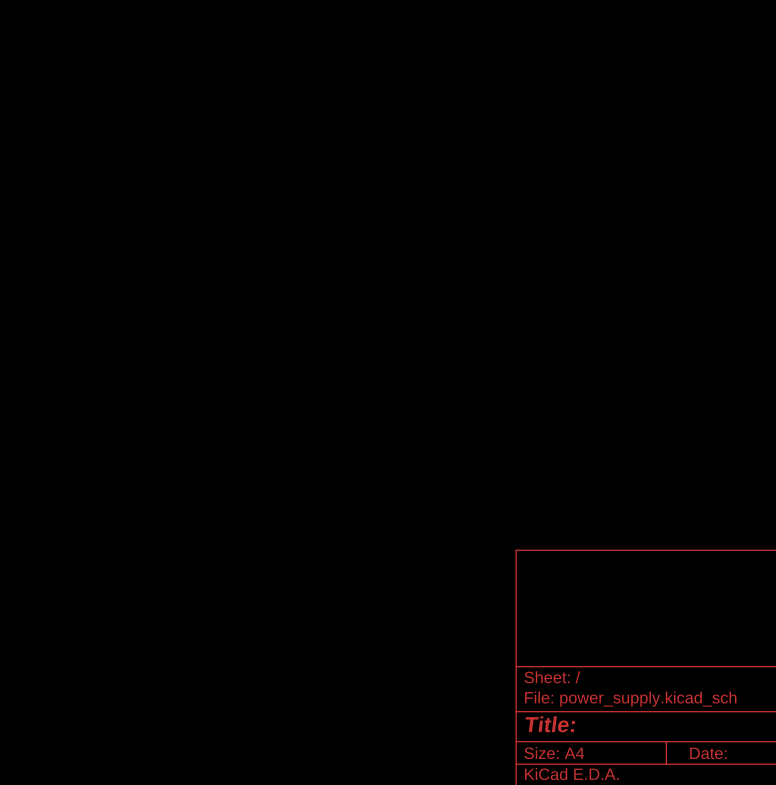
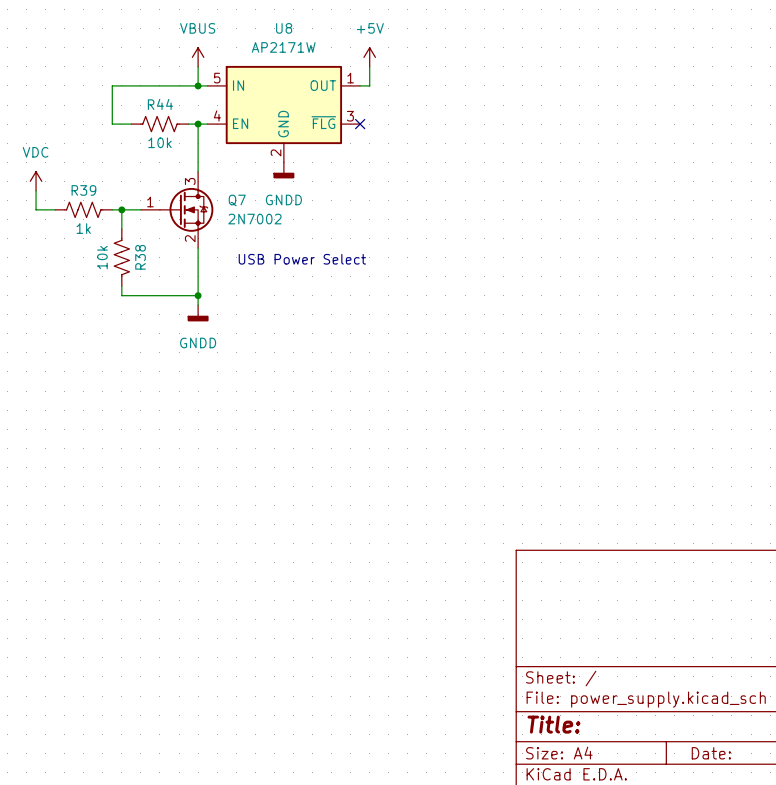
power symbol: none -> VBUS (198, 57)
power symbol: none -> +5V (369, 57)
wire: none -> (198, 66) (198, 85)
wire: none -> (369, 66) (369, 85) (360, 85)
junction: none -> (198, 85)
wire: none -> (207, 85) (112, 85) (112, 124) (131, 124)
U8: none -> AP2171W (283, 114)
R44: none -> 10k (159, 124)
wire: none -> (188, 124) (207, 124)
wire: none -> (198, 124) (198, 171)
junction: none -> (198, 124)
no-connect mark: none -> (360, 124)
power symbol: none -> GNDD (283, 170)
power symbol: none -> VDC (36, 181)
wire: none -> (36, 190) (36, 209) (55, 209)
R39: none -> 1k (83, 209)
wire: none -> (112, 209) (140, 209)
wire: none -> (121, 209) (121, 228)
junction: none -> (121, 209)
Q7: none -> 2N7002 (177, 209)
wire: none -> (198, 248) (198, 305)
R38: none -> 10k (121, 257)
text: none -> USB Power Select (302, 259)
wire: none -> (121, 286) (121, 295) (198, 295)
junction: none -> (198, 295)
power symbol: none -> GNDD (198, 313)

